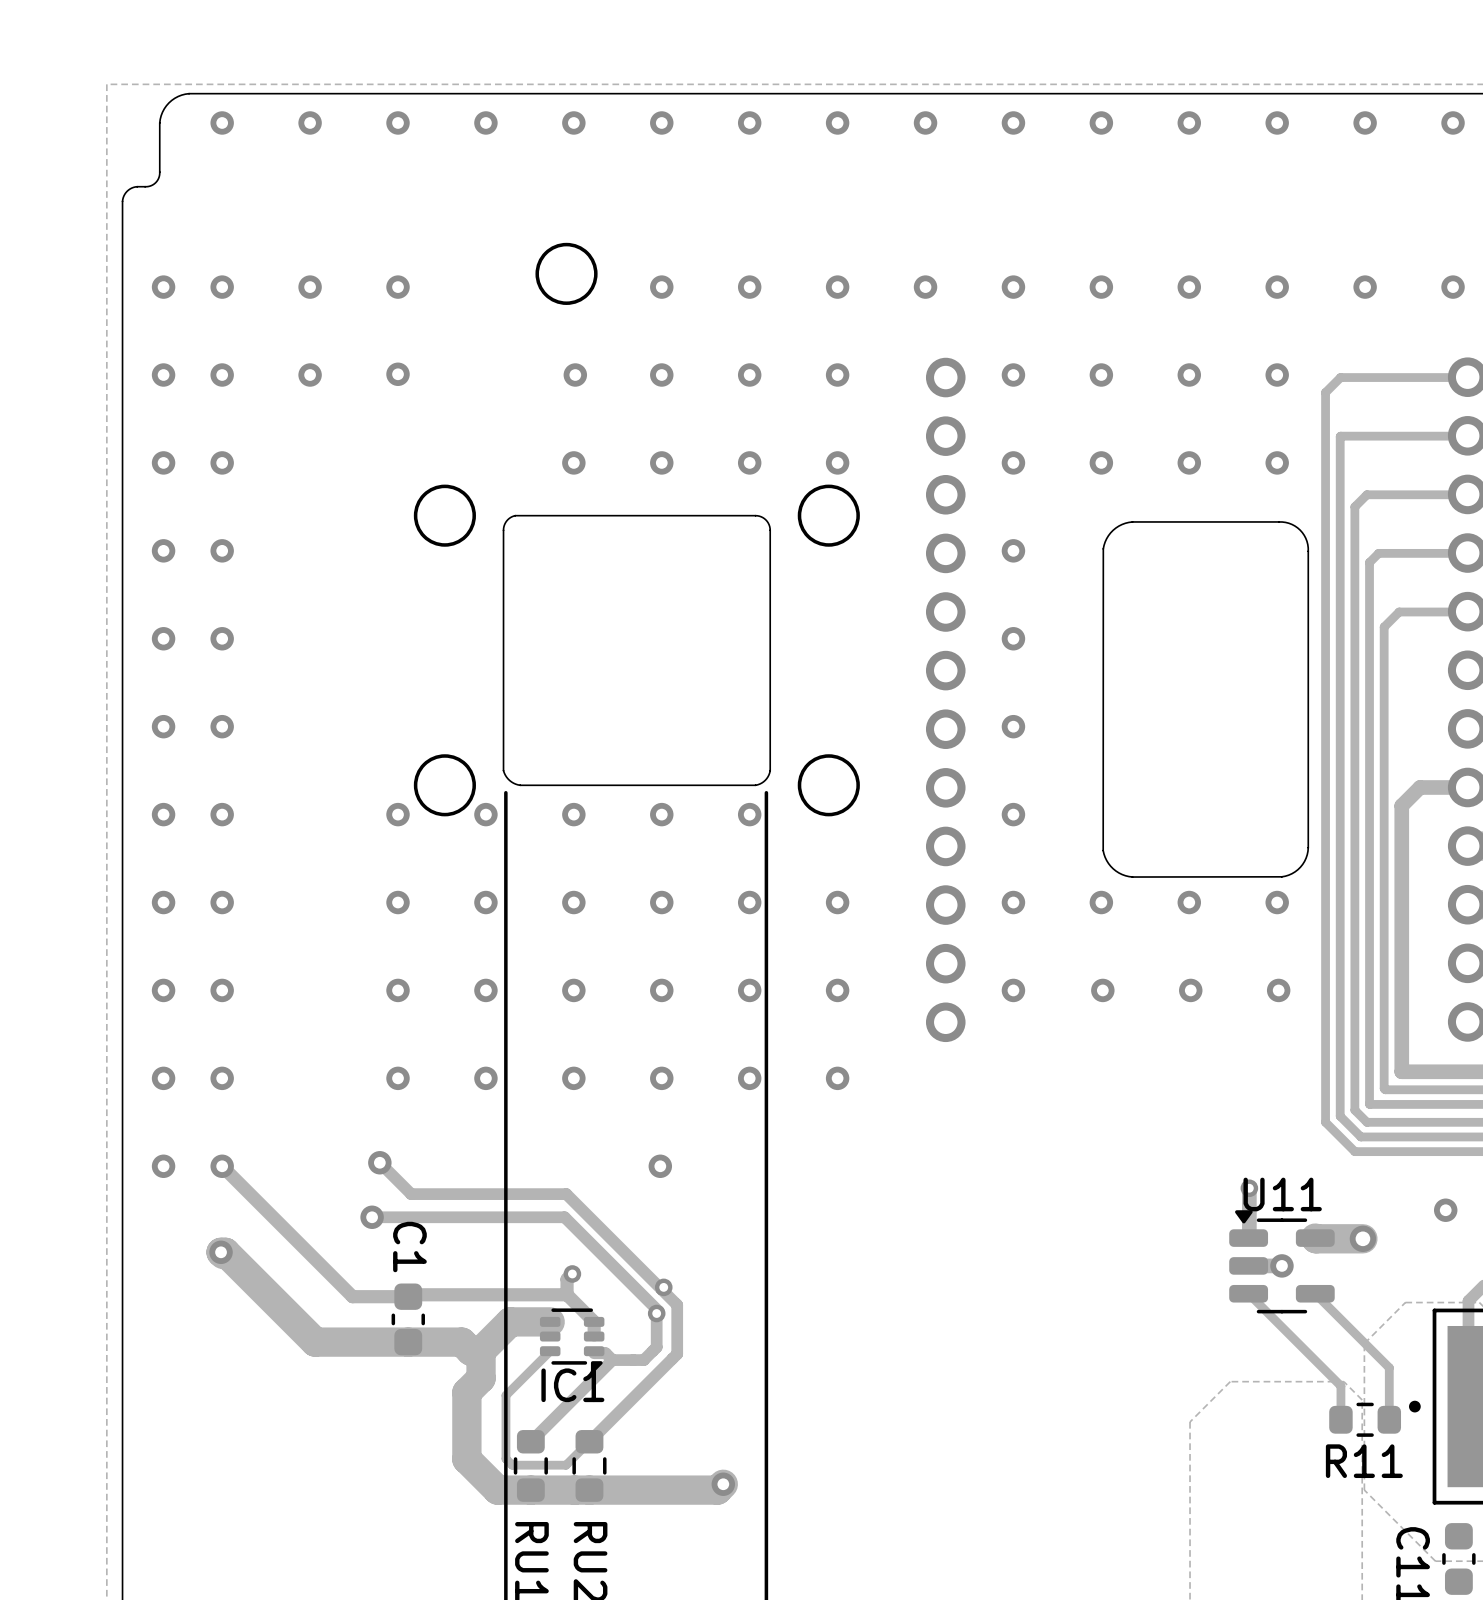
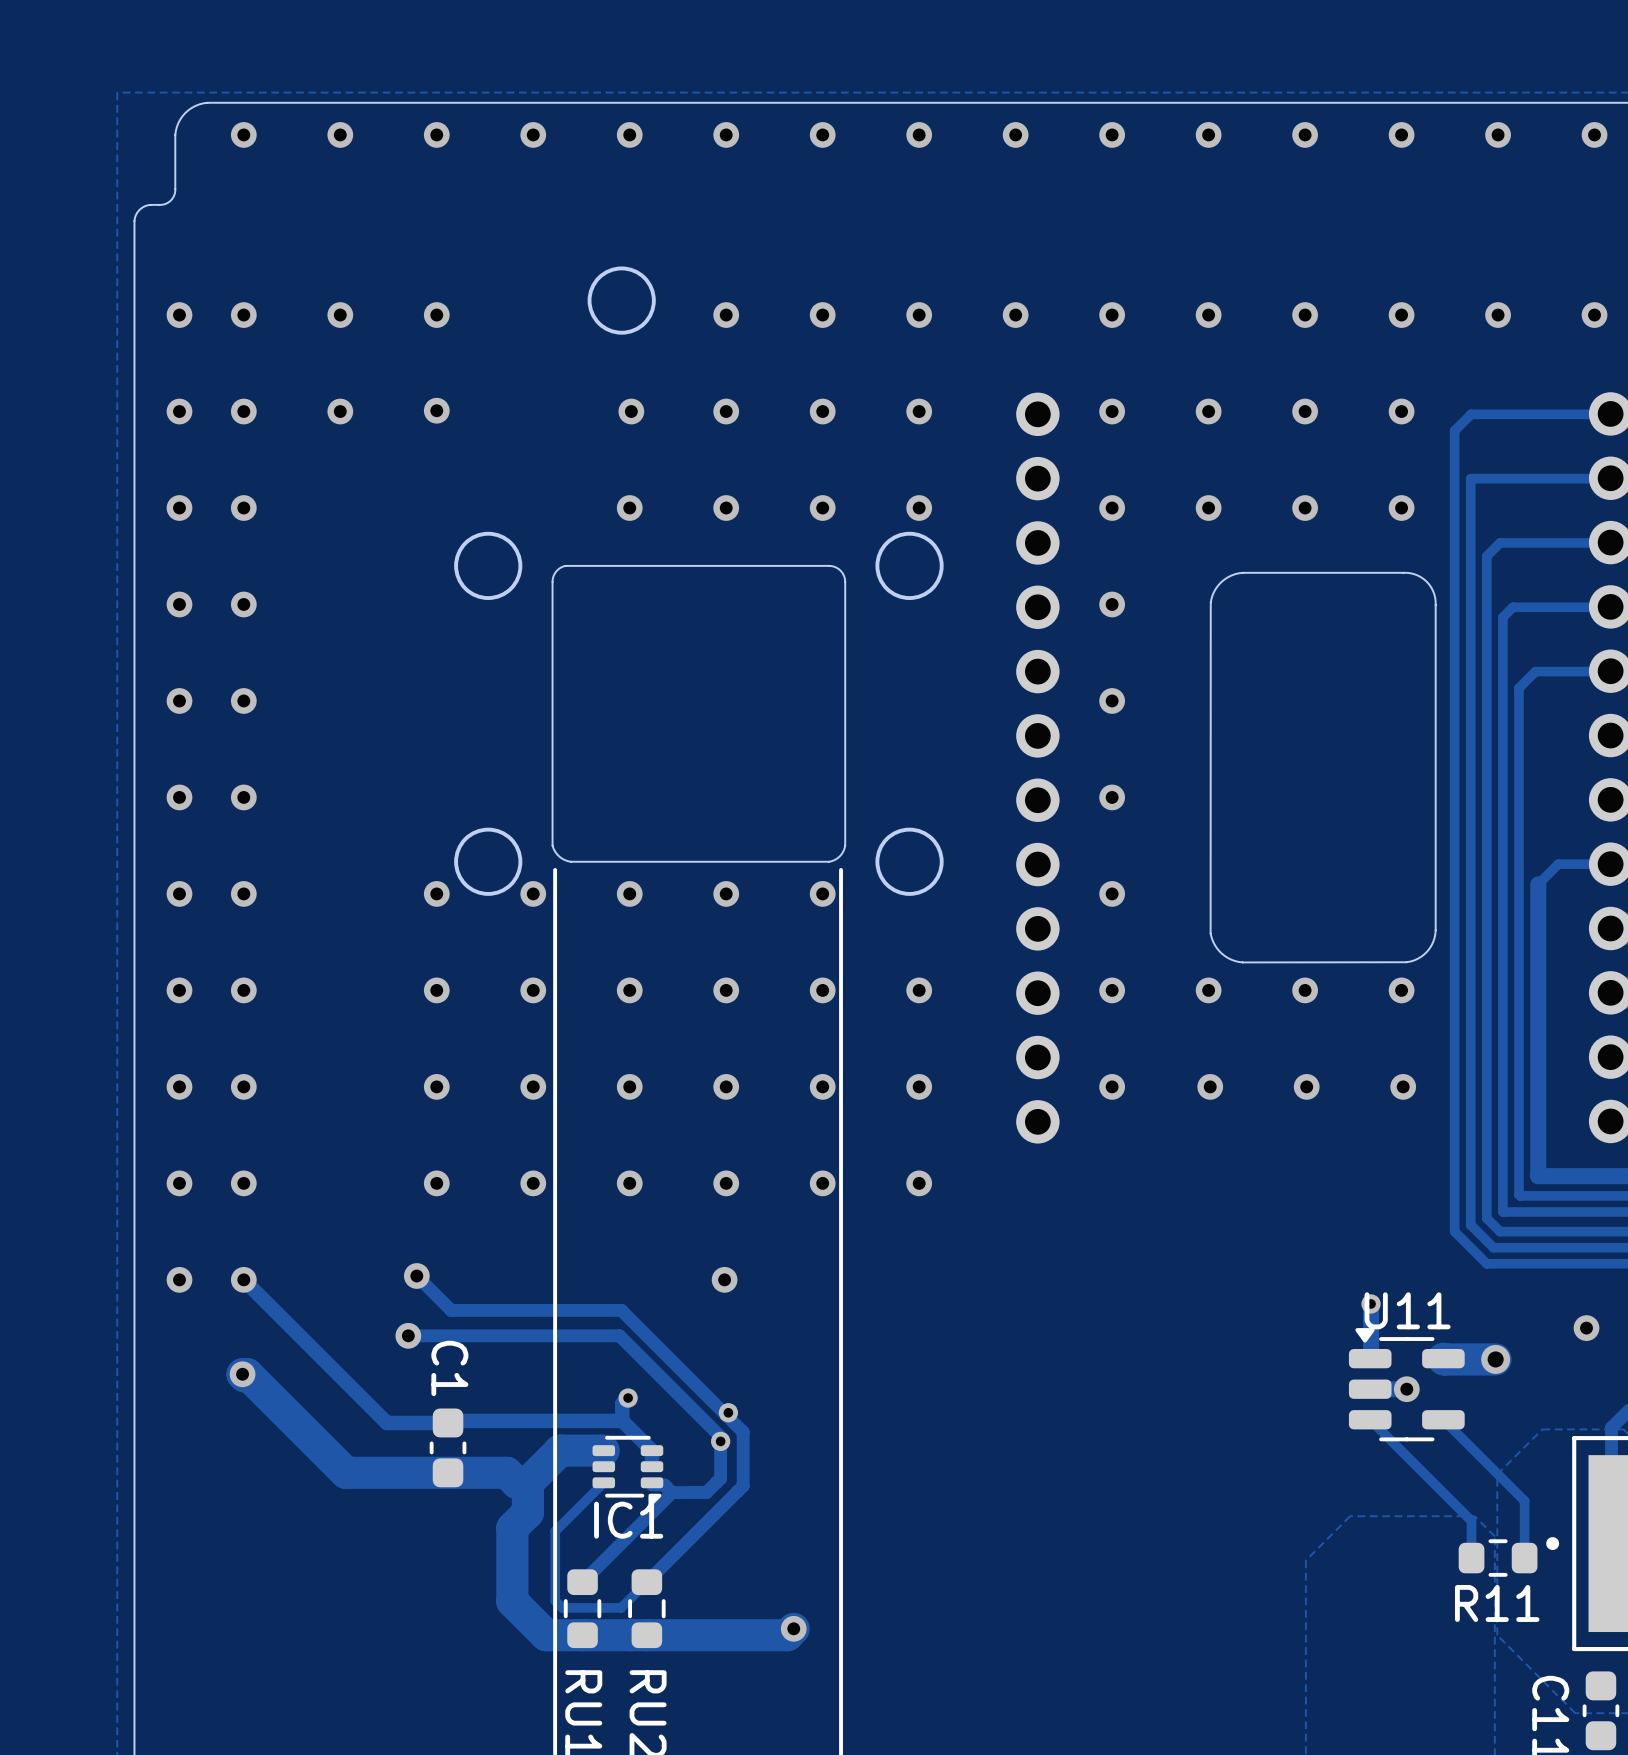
track width: thick (1467, 787) (1420, 787) (1401, 805) -> thin (1610, 864) (1558, 864) (1538, 884)

